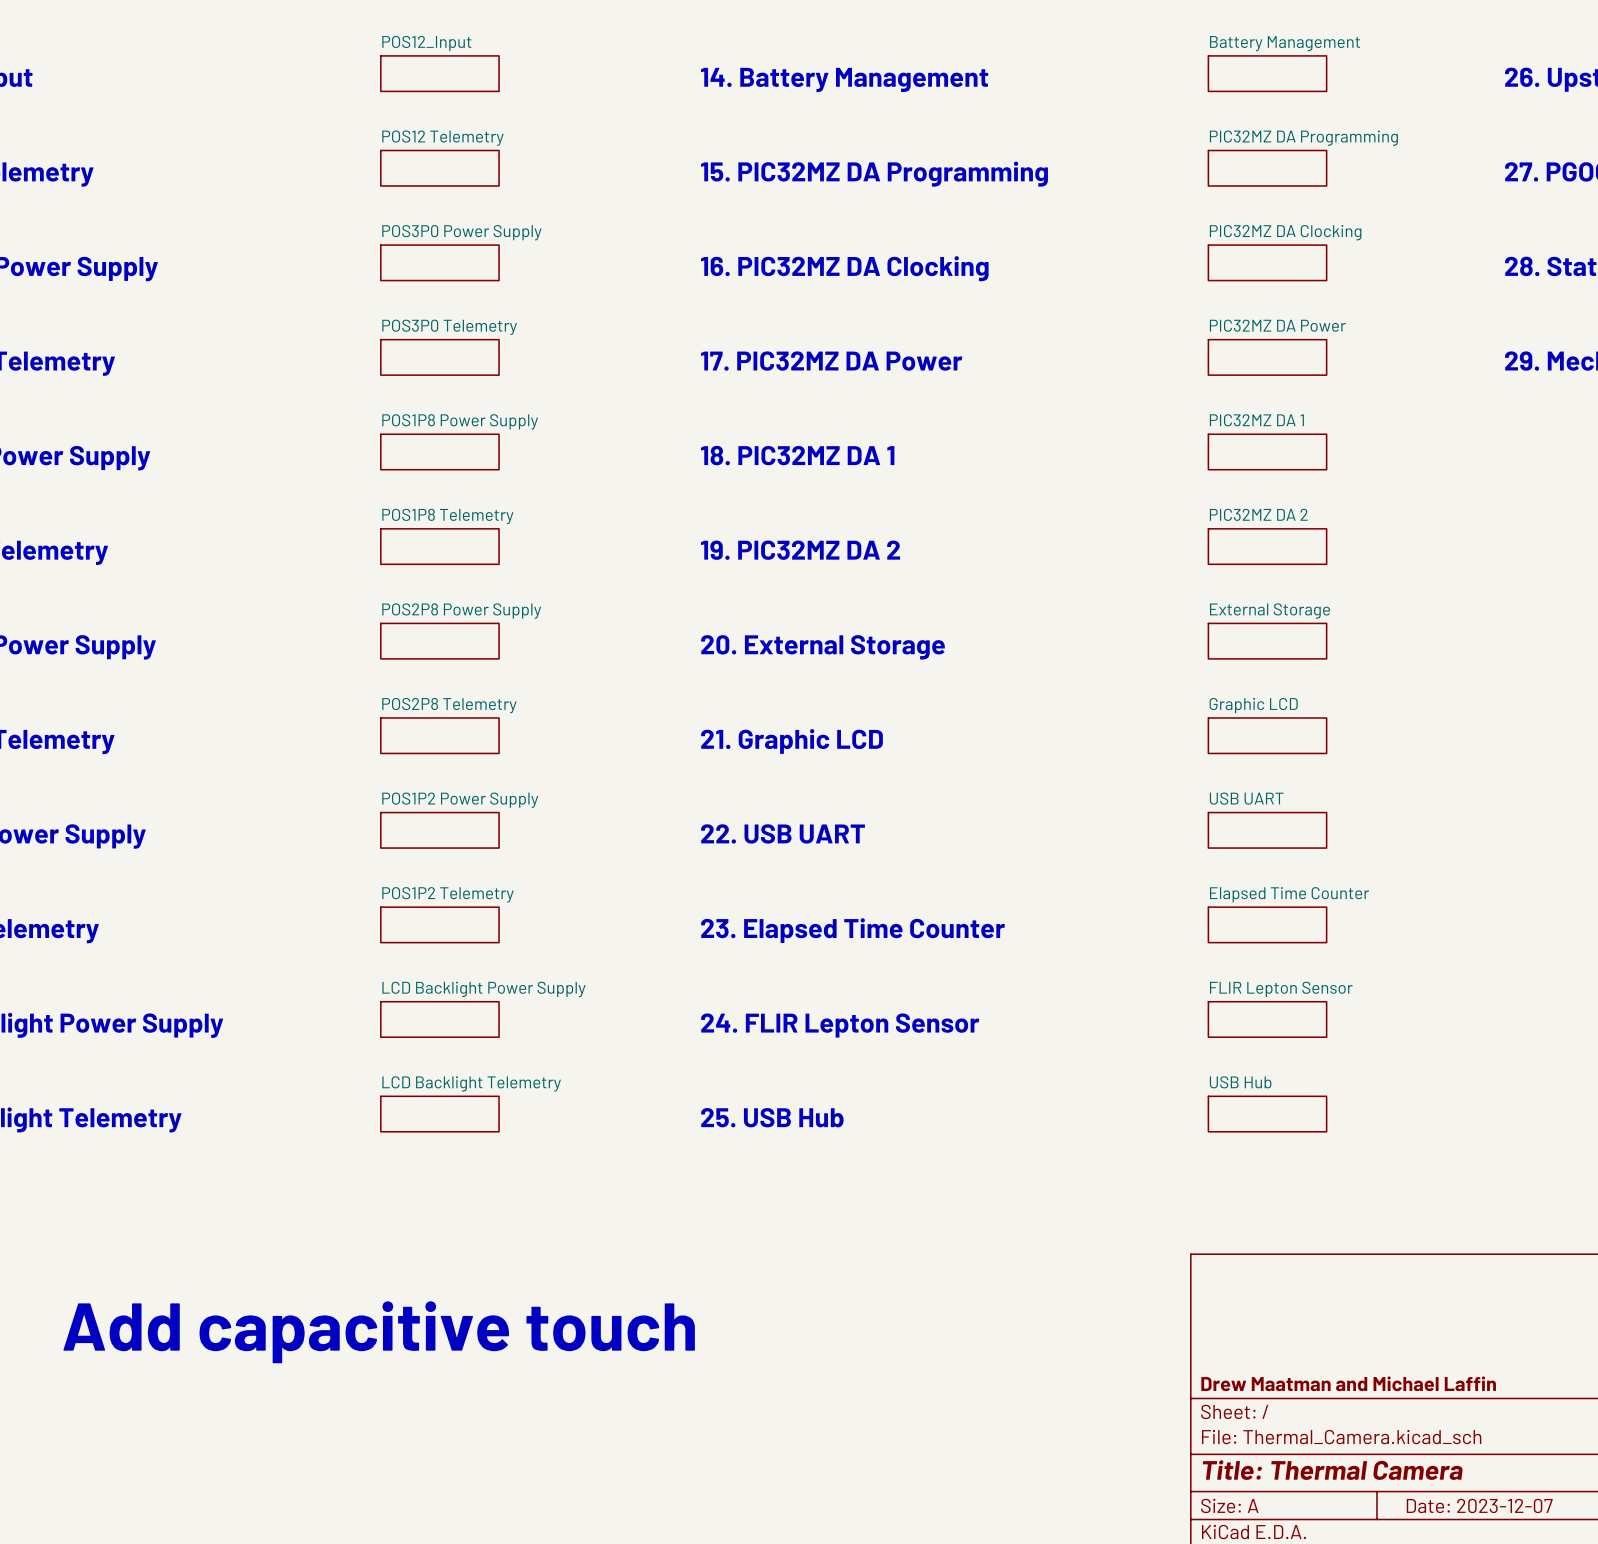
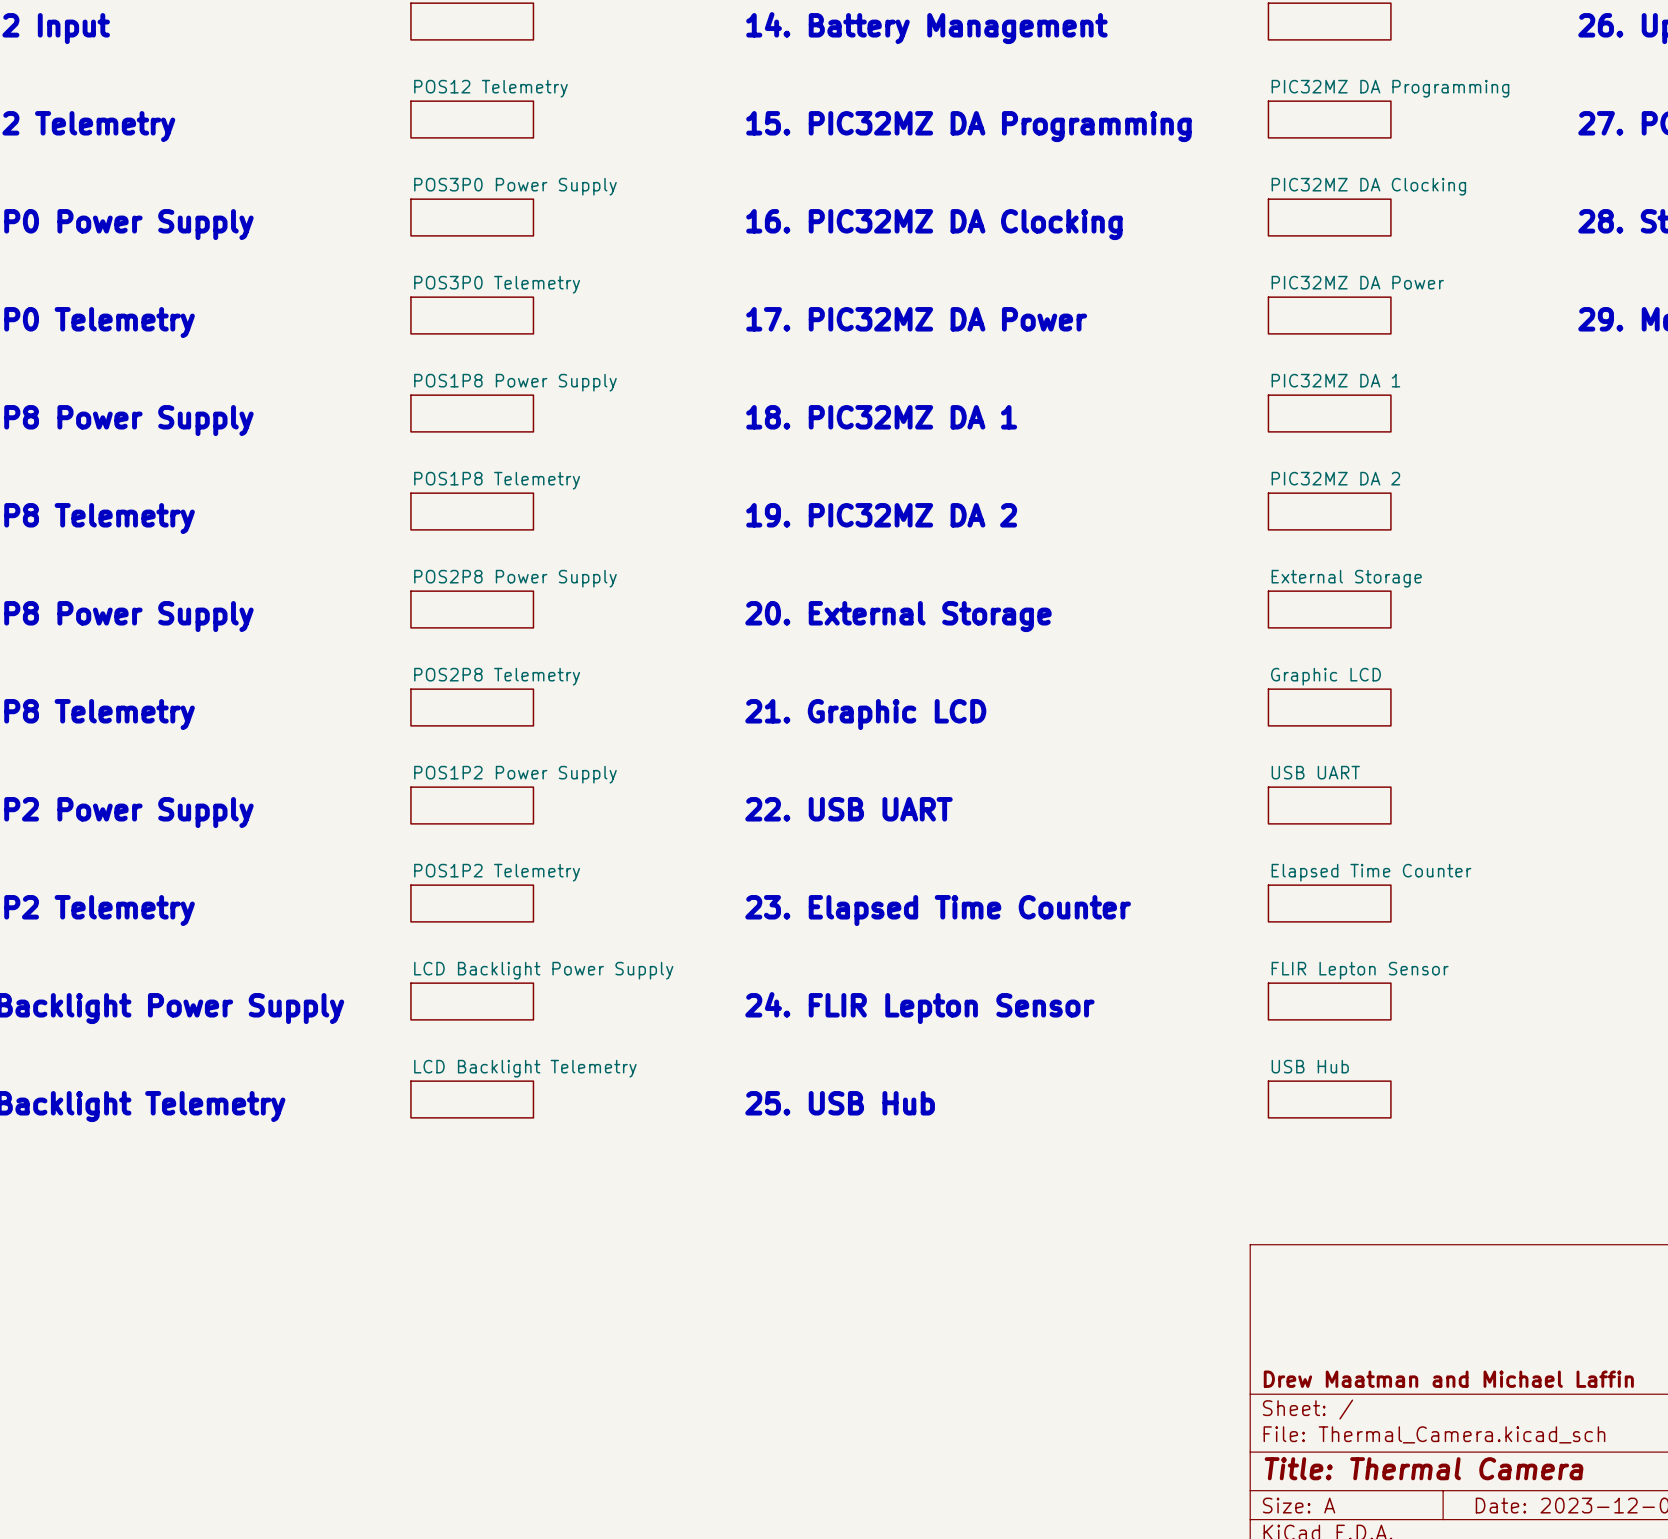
text: Add capacitive touch (379, 1332) -> none

